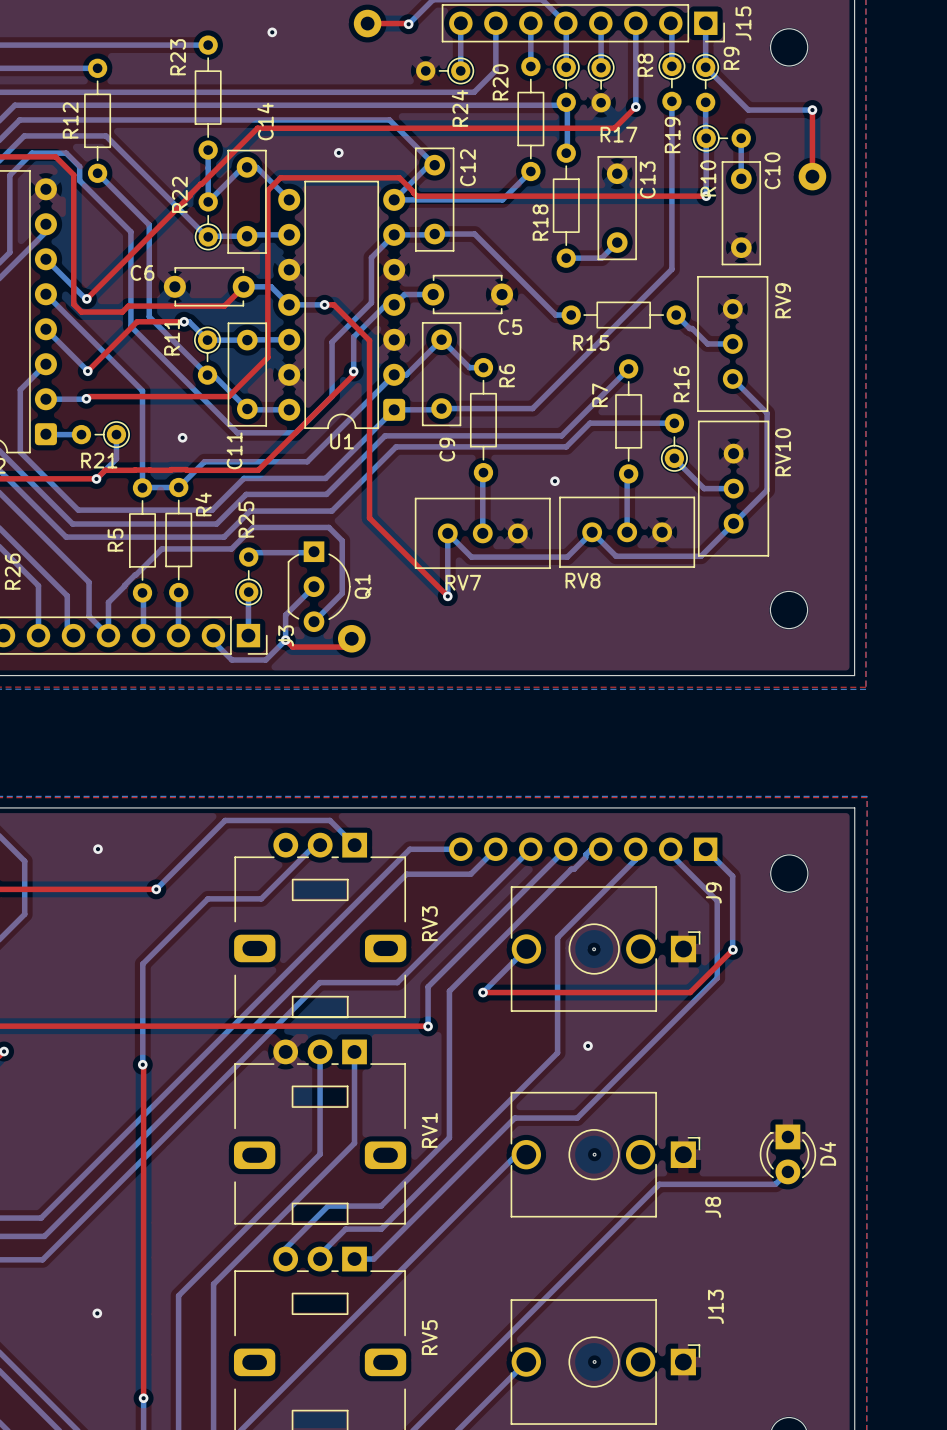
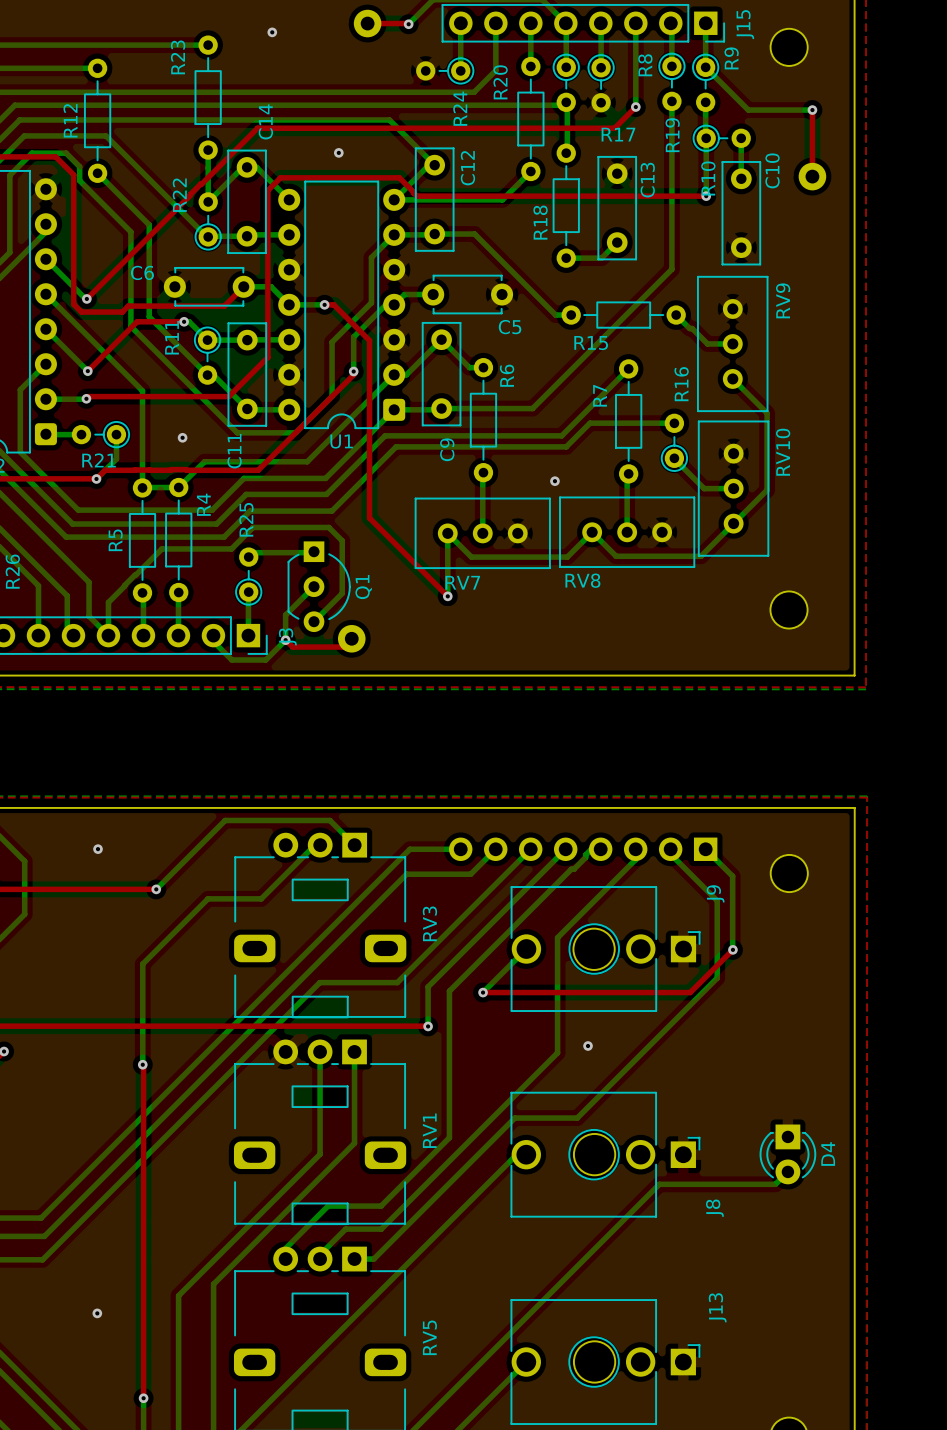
round board edge size: [592, 947, 596, 952] -> [573, 928, 616, 971]
round board edge size: [592, 1152, 597, 1157] -> [573, 1133, 616, 1176]
round board edge size: [592, 1360, 597, 1364] -> [573, 1340, 616, 1383]

